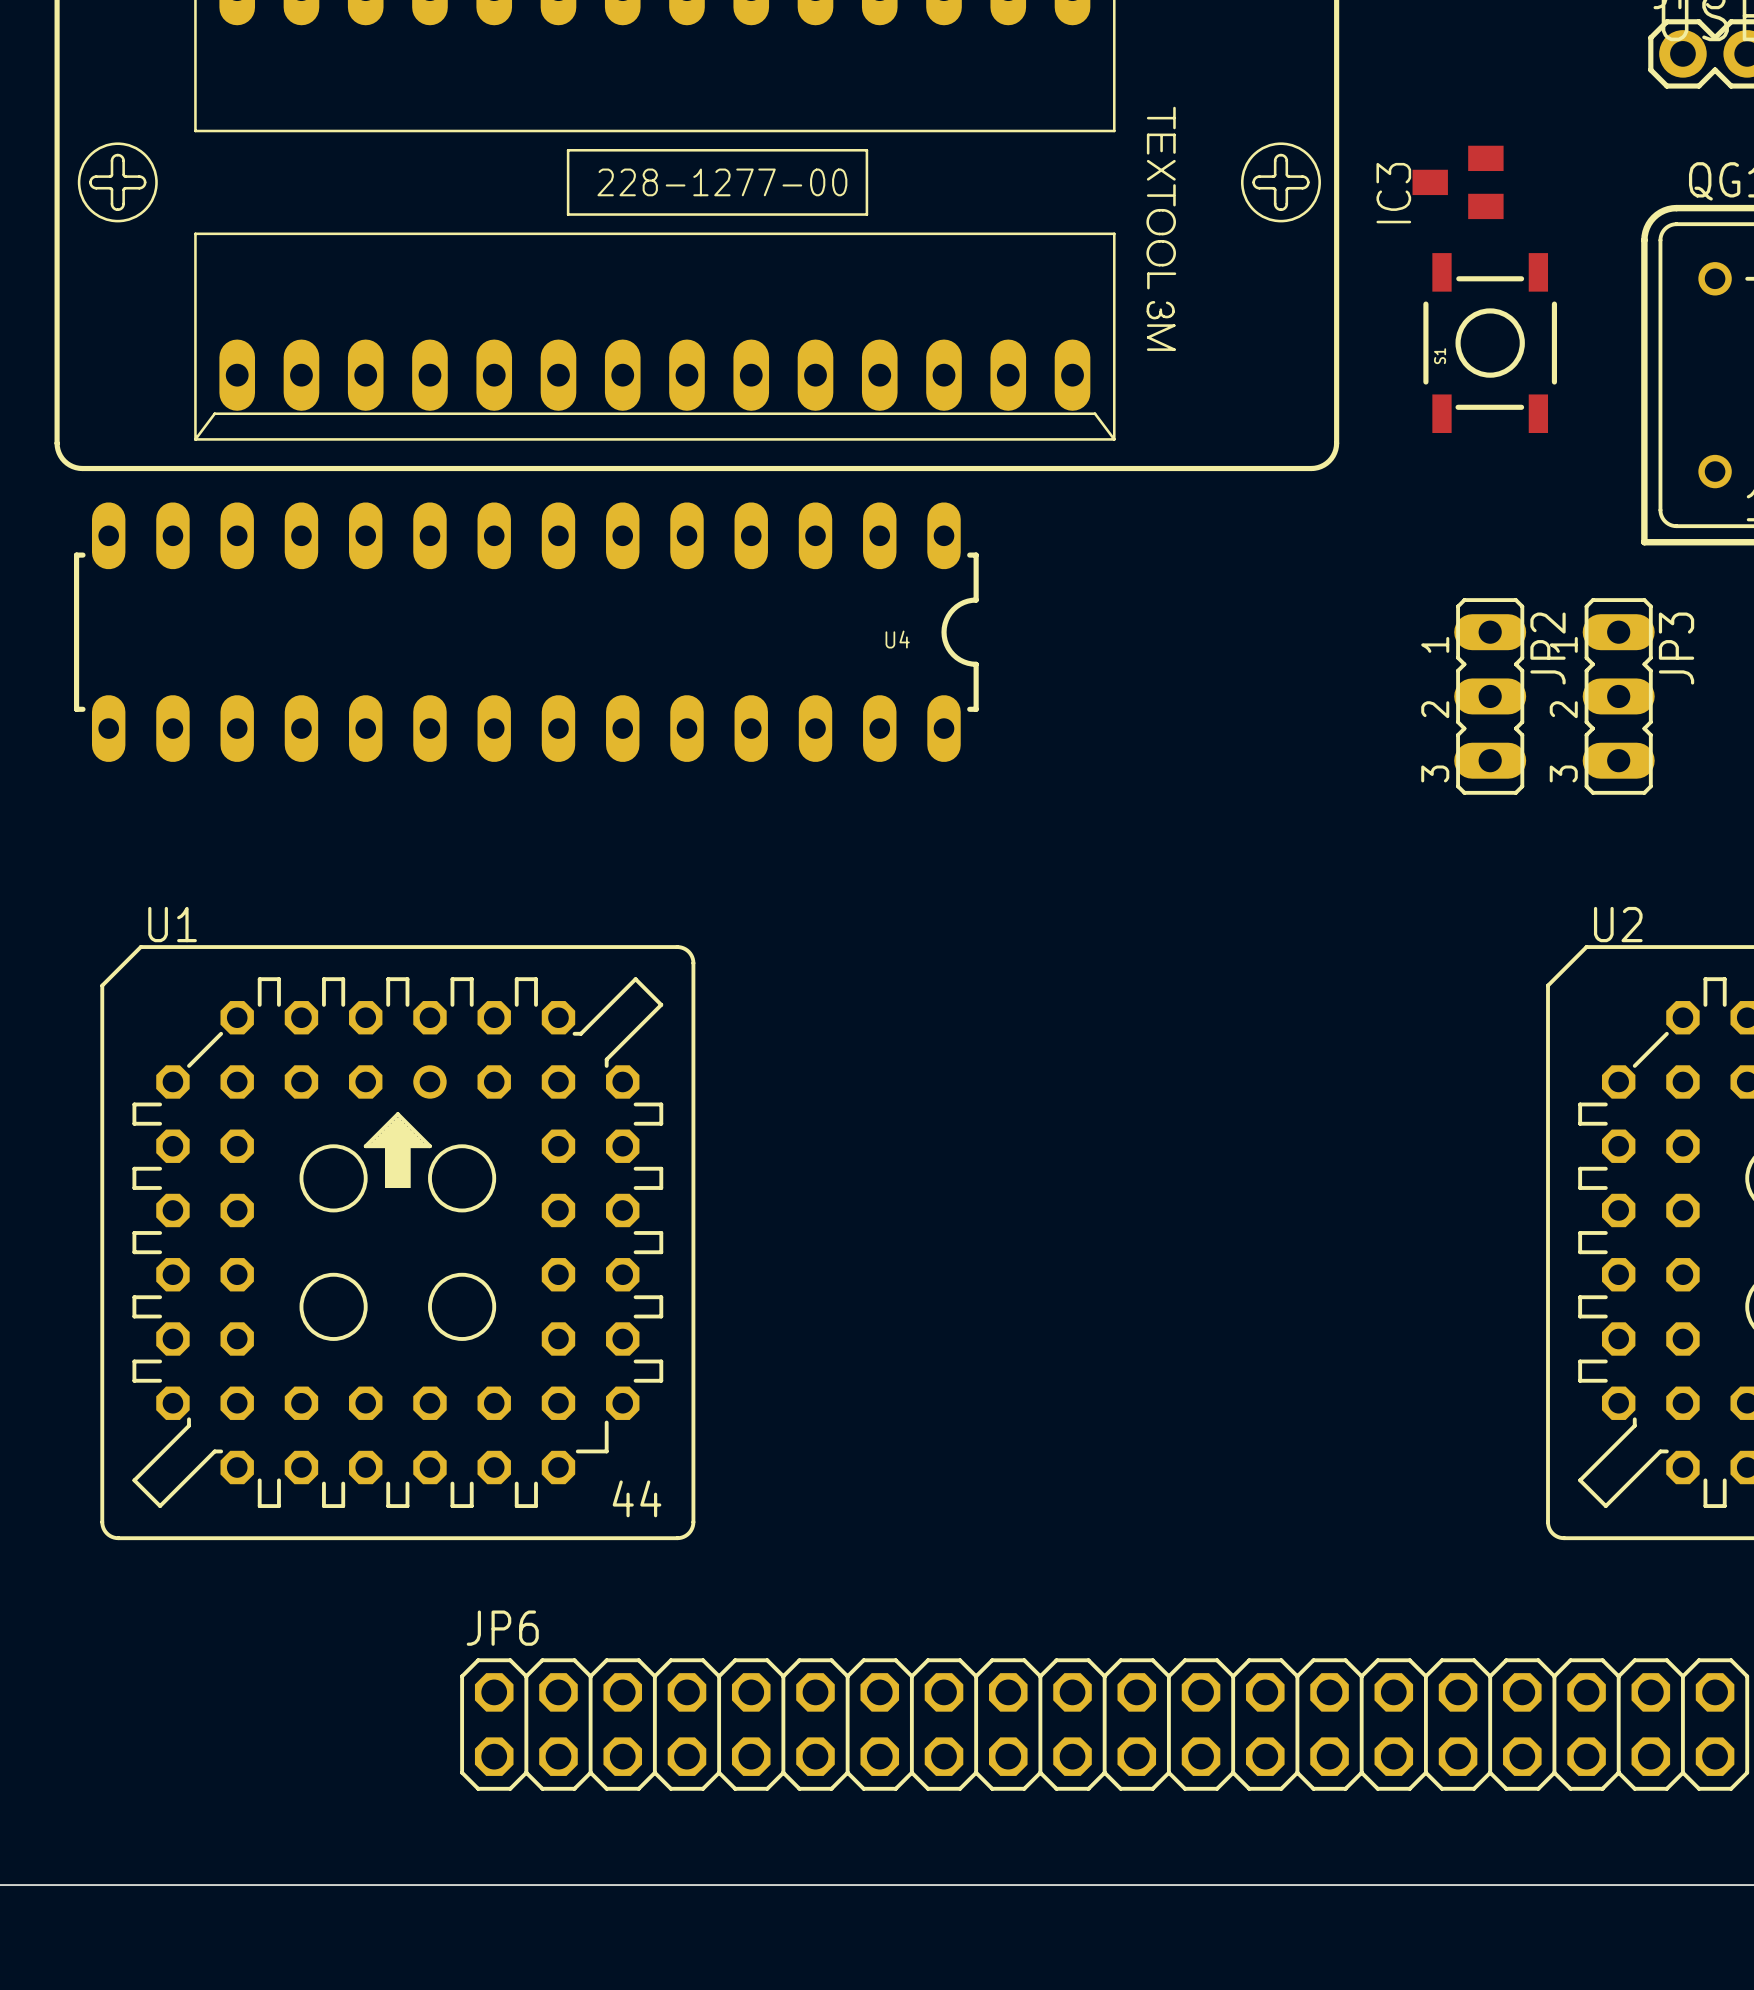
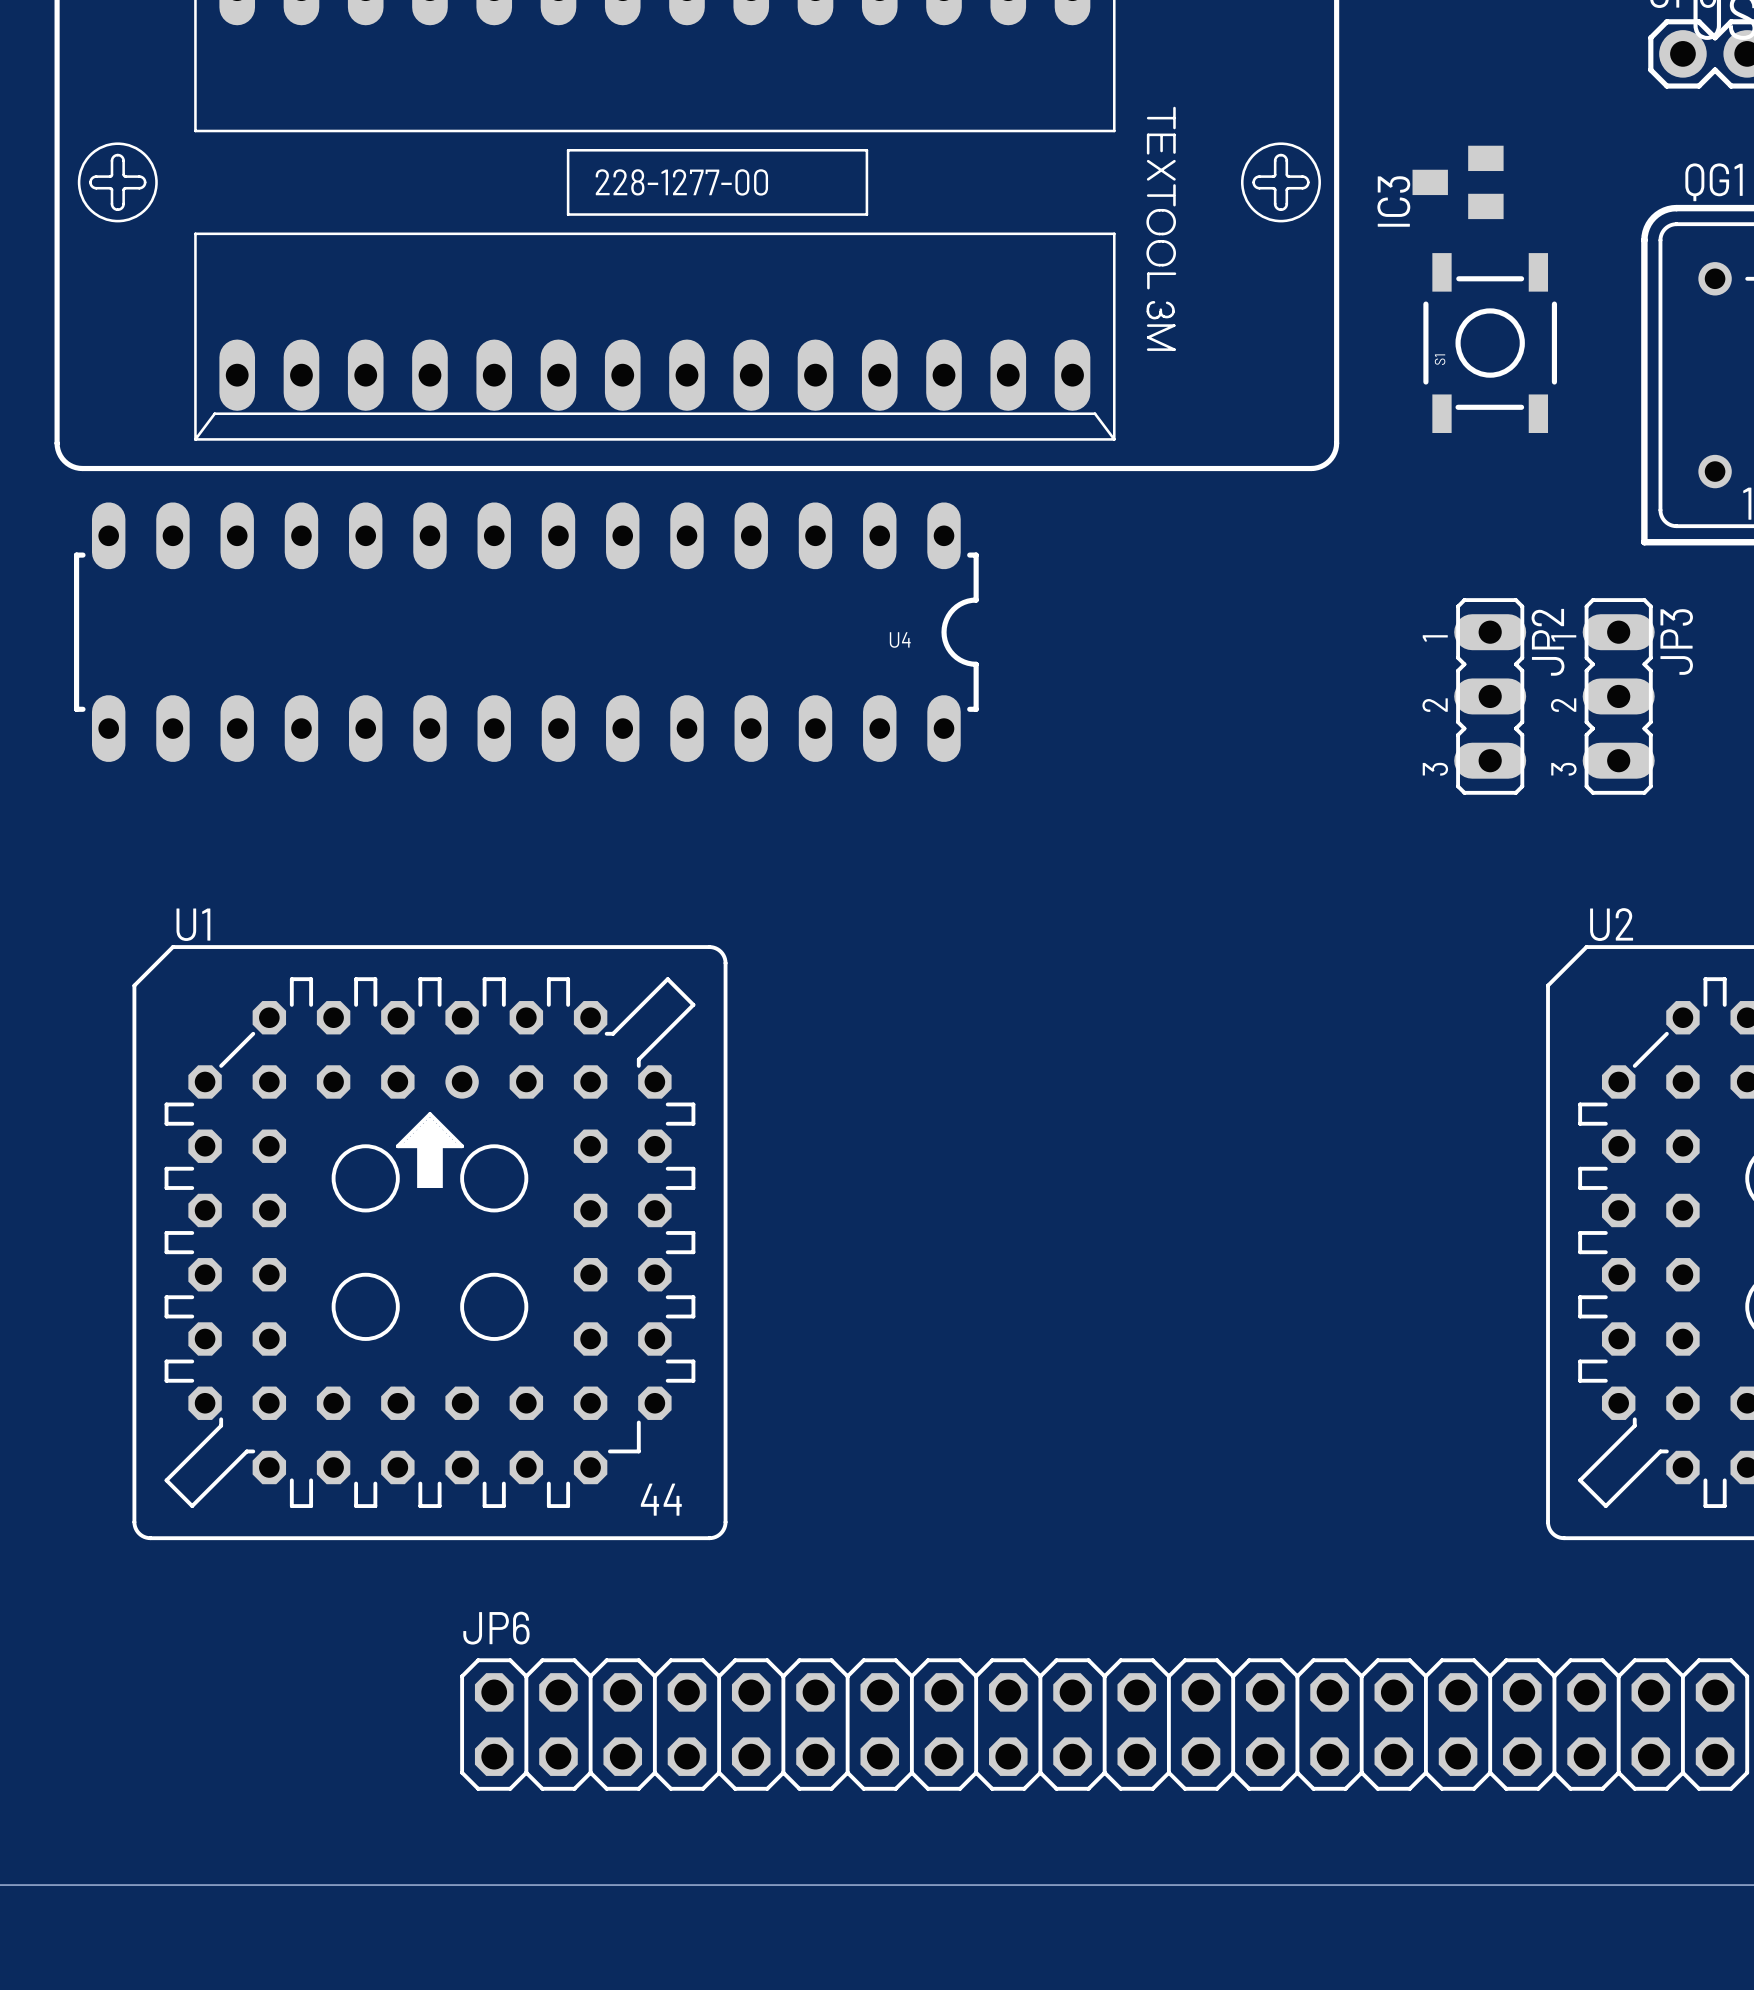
U1 position: (397, 1242) -> (429, 1242)

